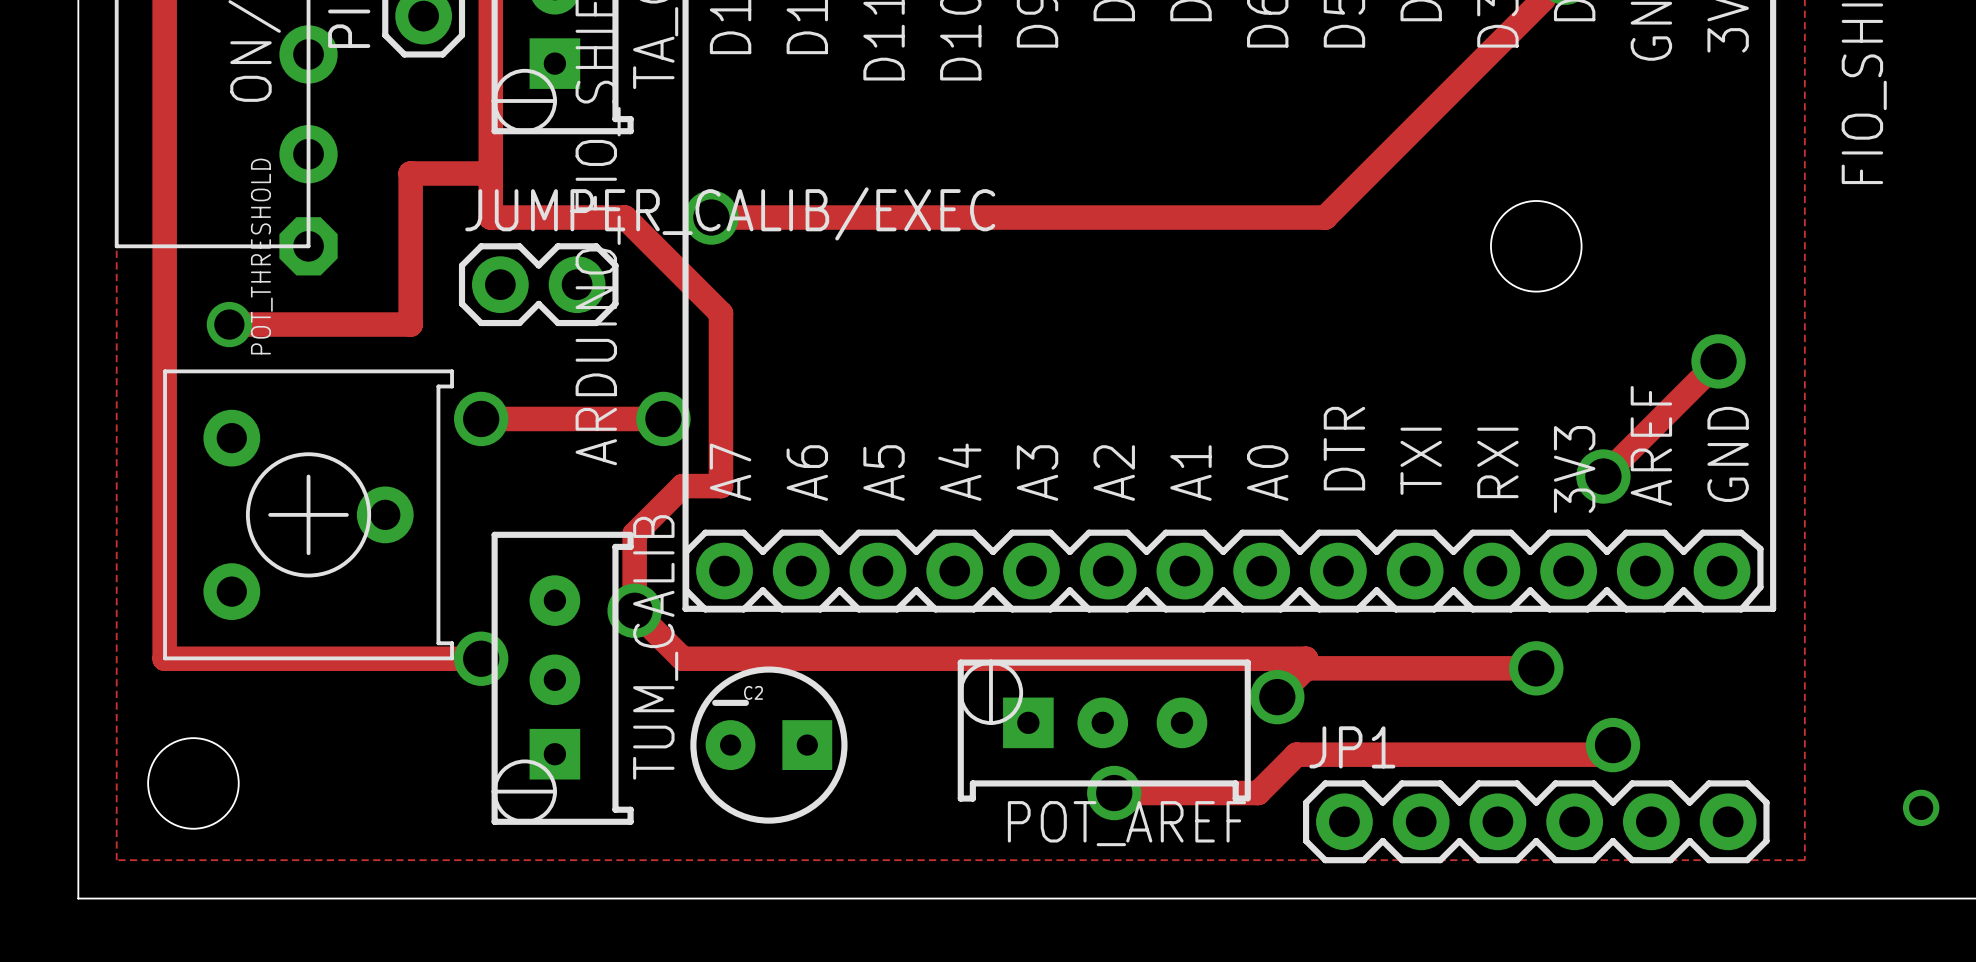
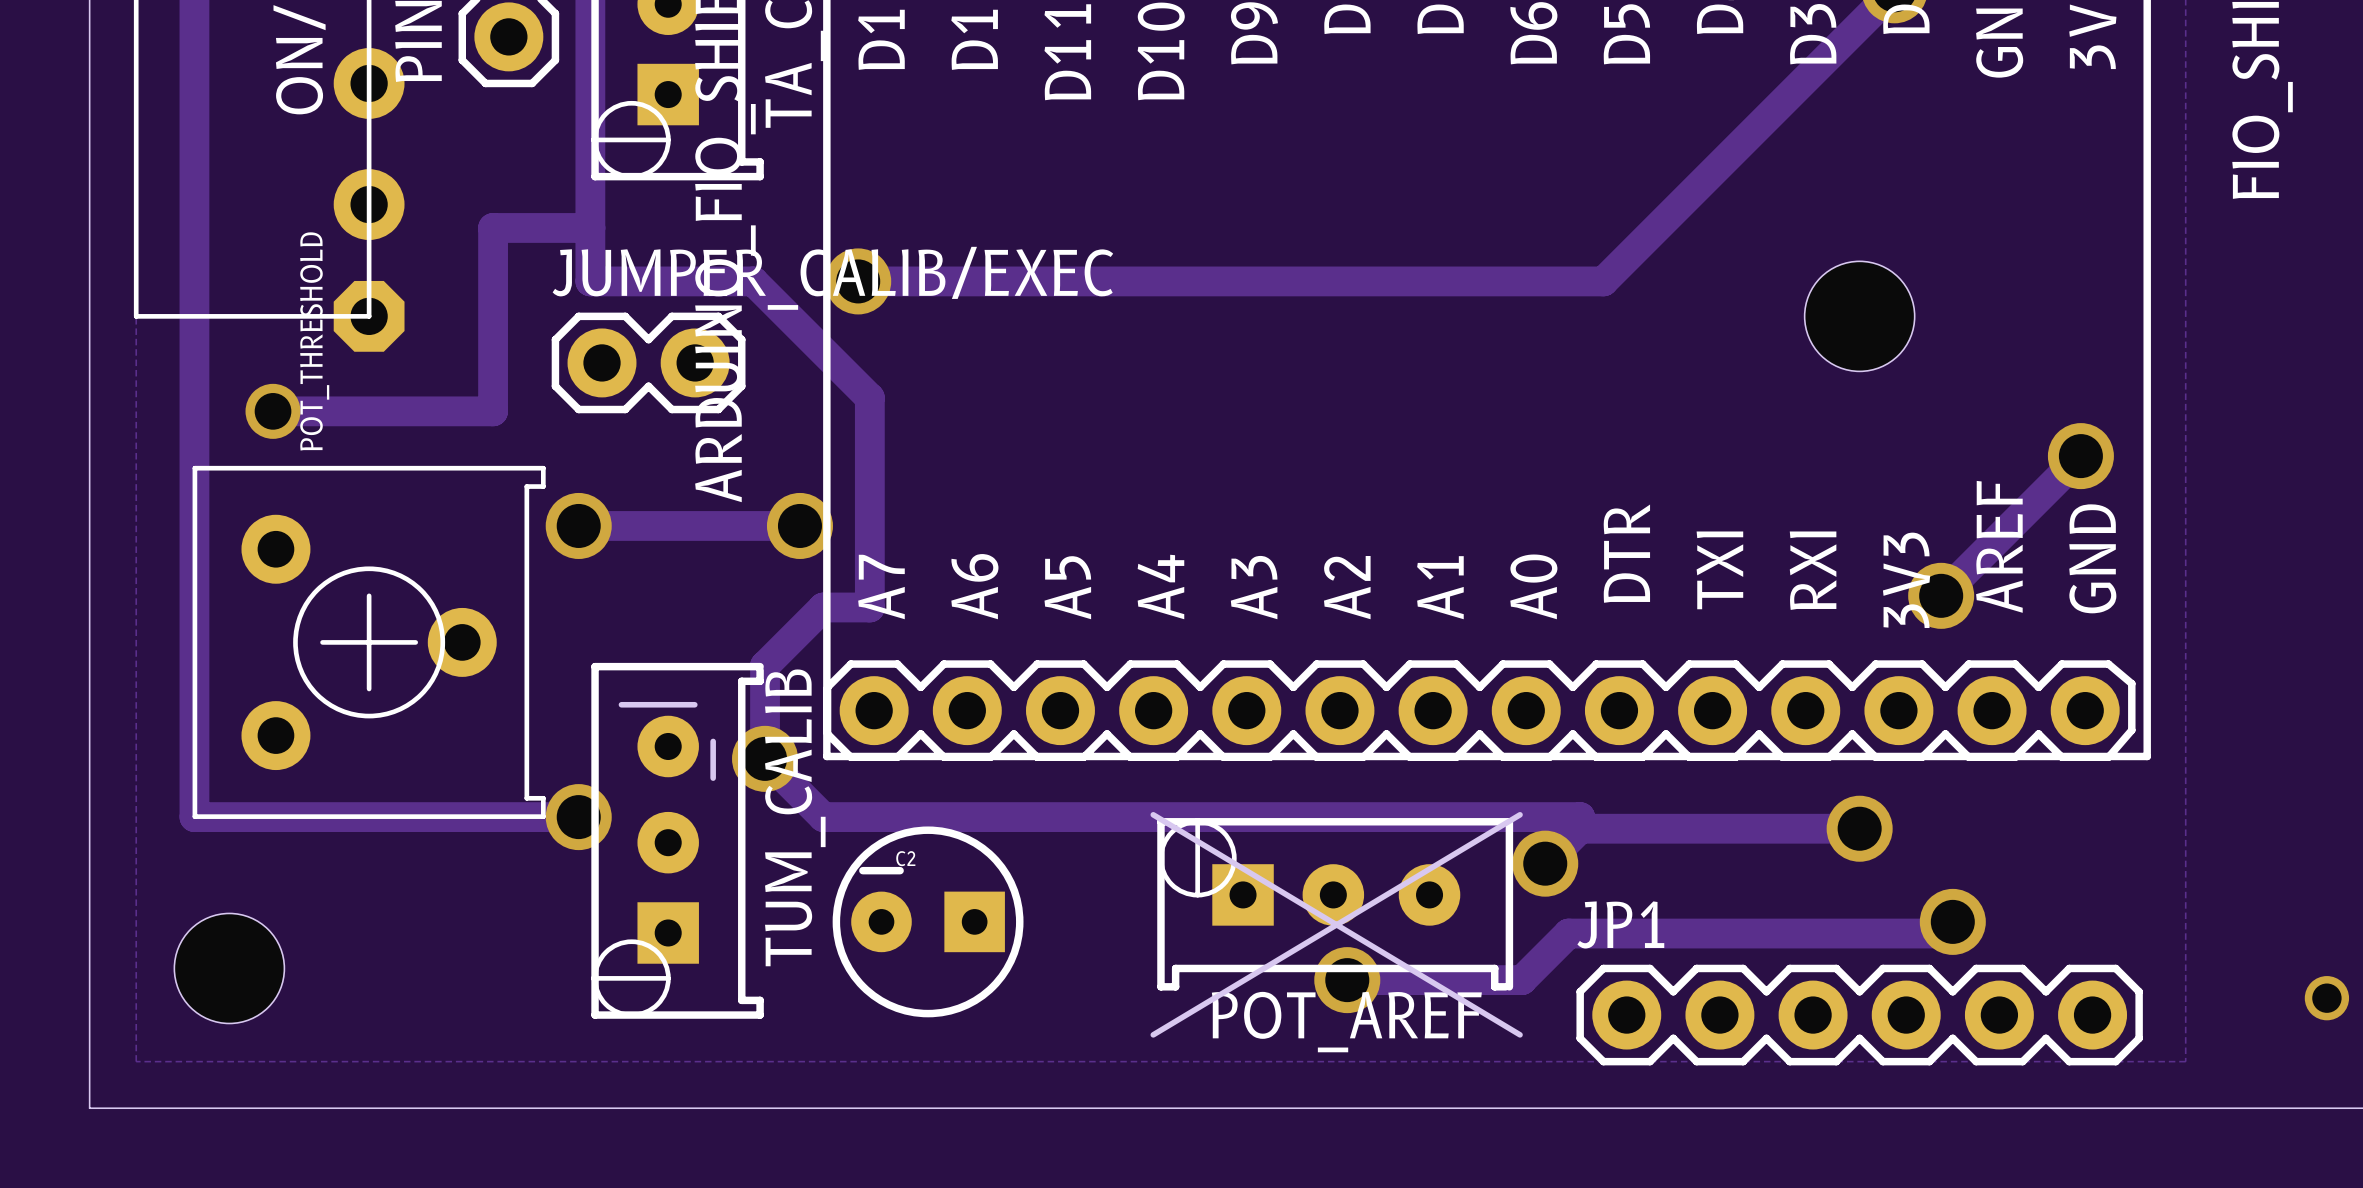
board edge: none -> (621, 704) (694, 704)
board edge: none -> (713, 741) (713, 778)
board edge: none -> (1153, 814) (1520, 1034)
board edge: none -> (1520, 814) (1153, 1034)

